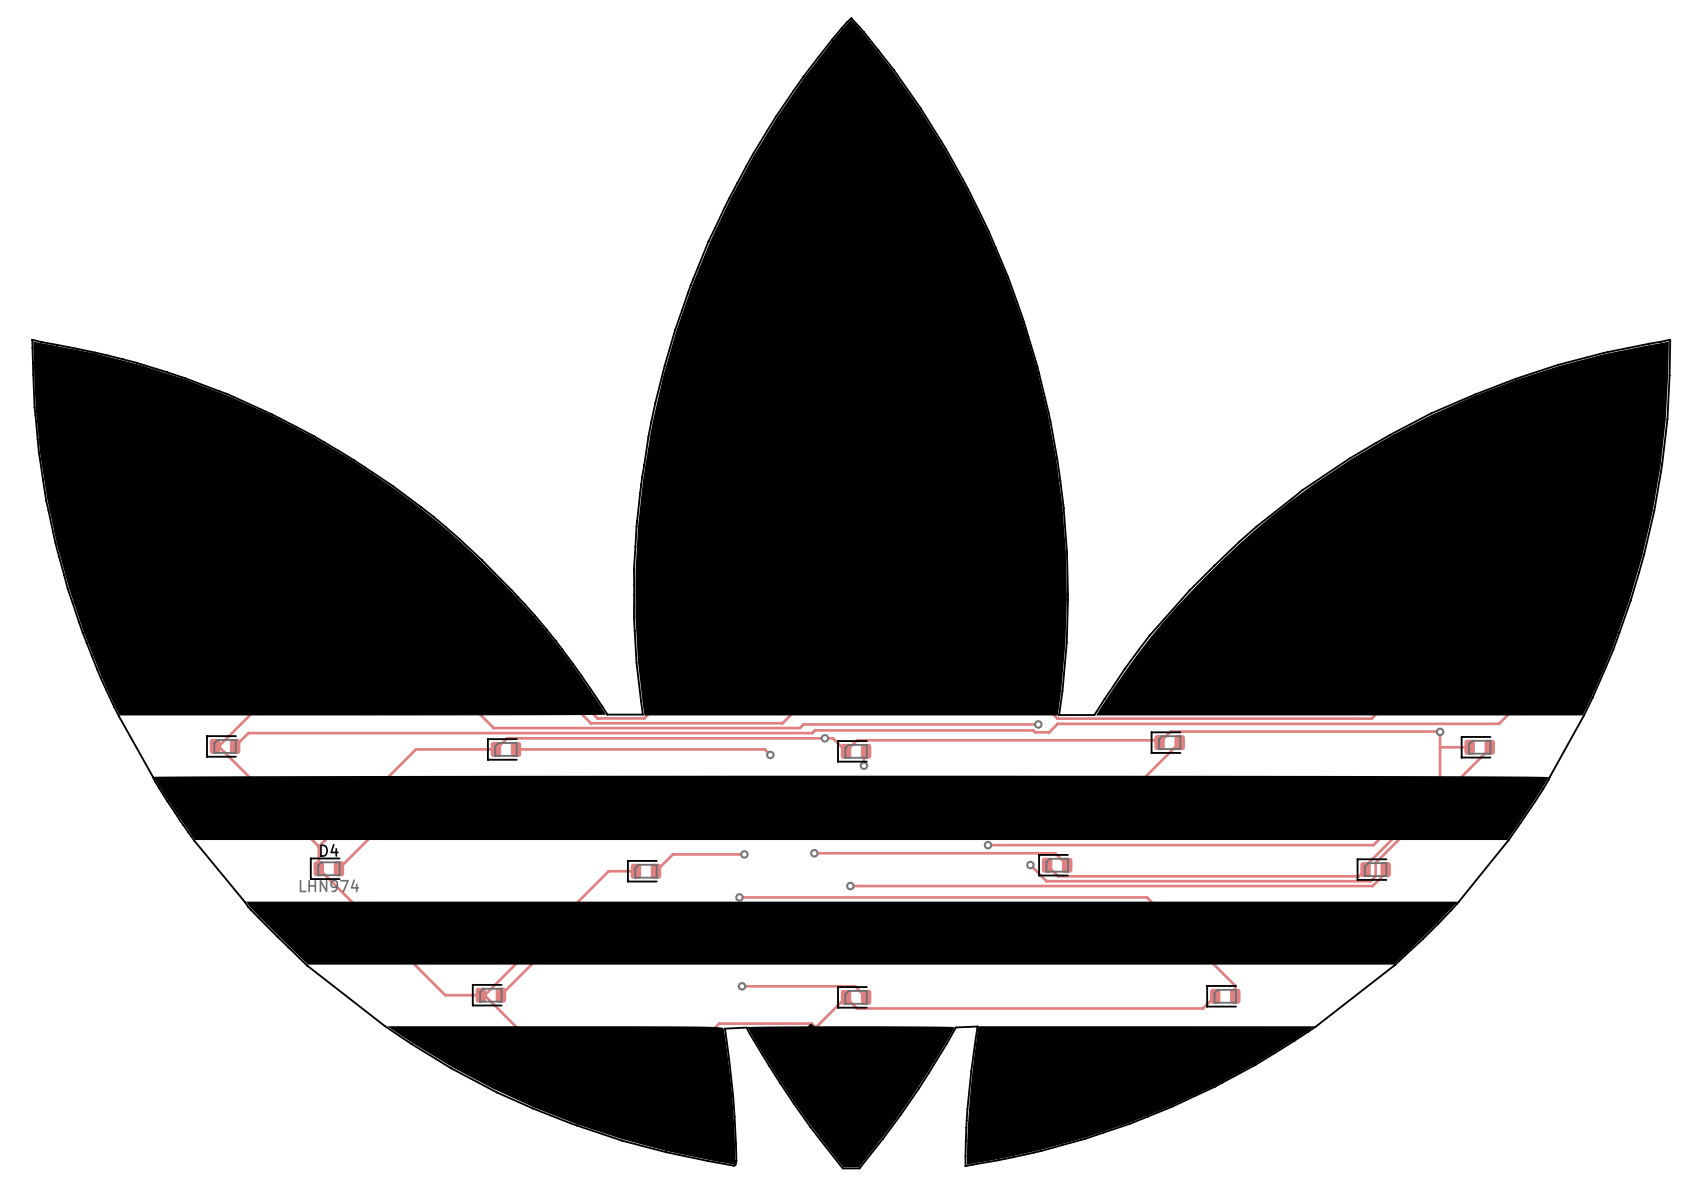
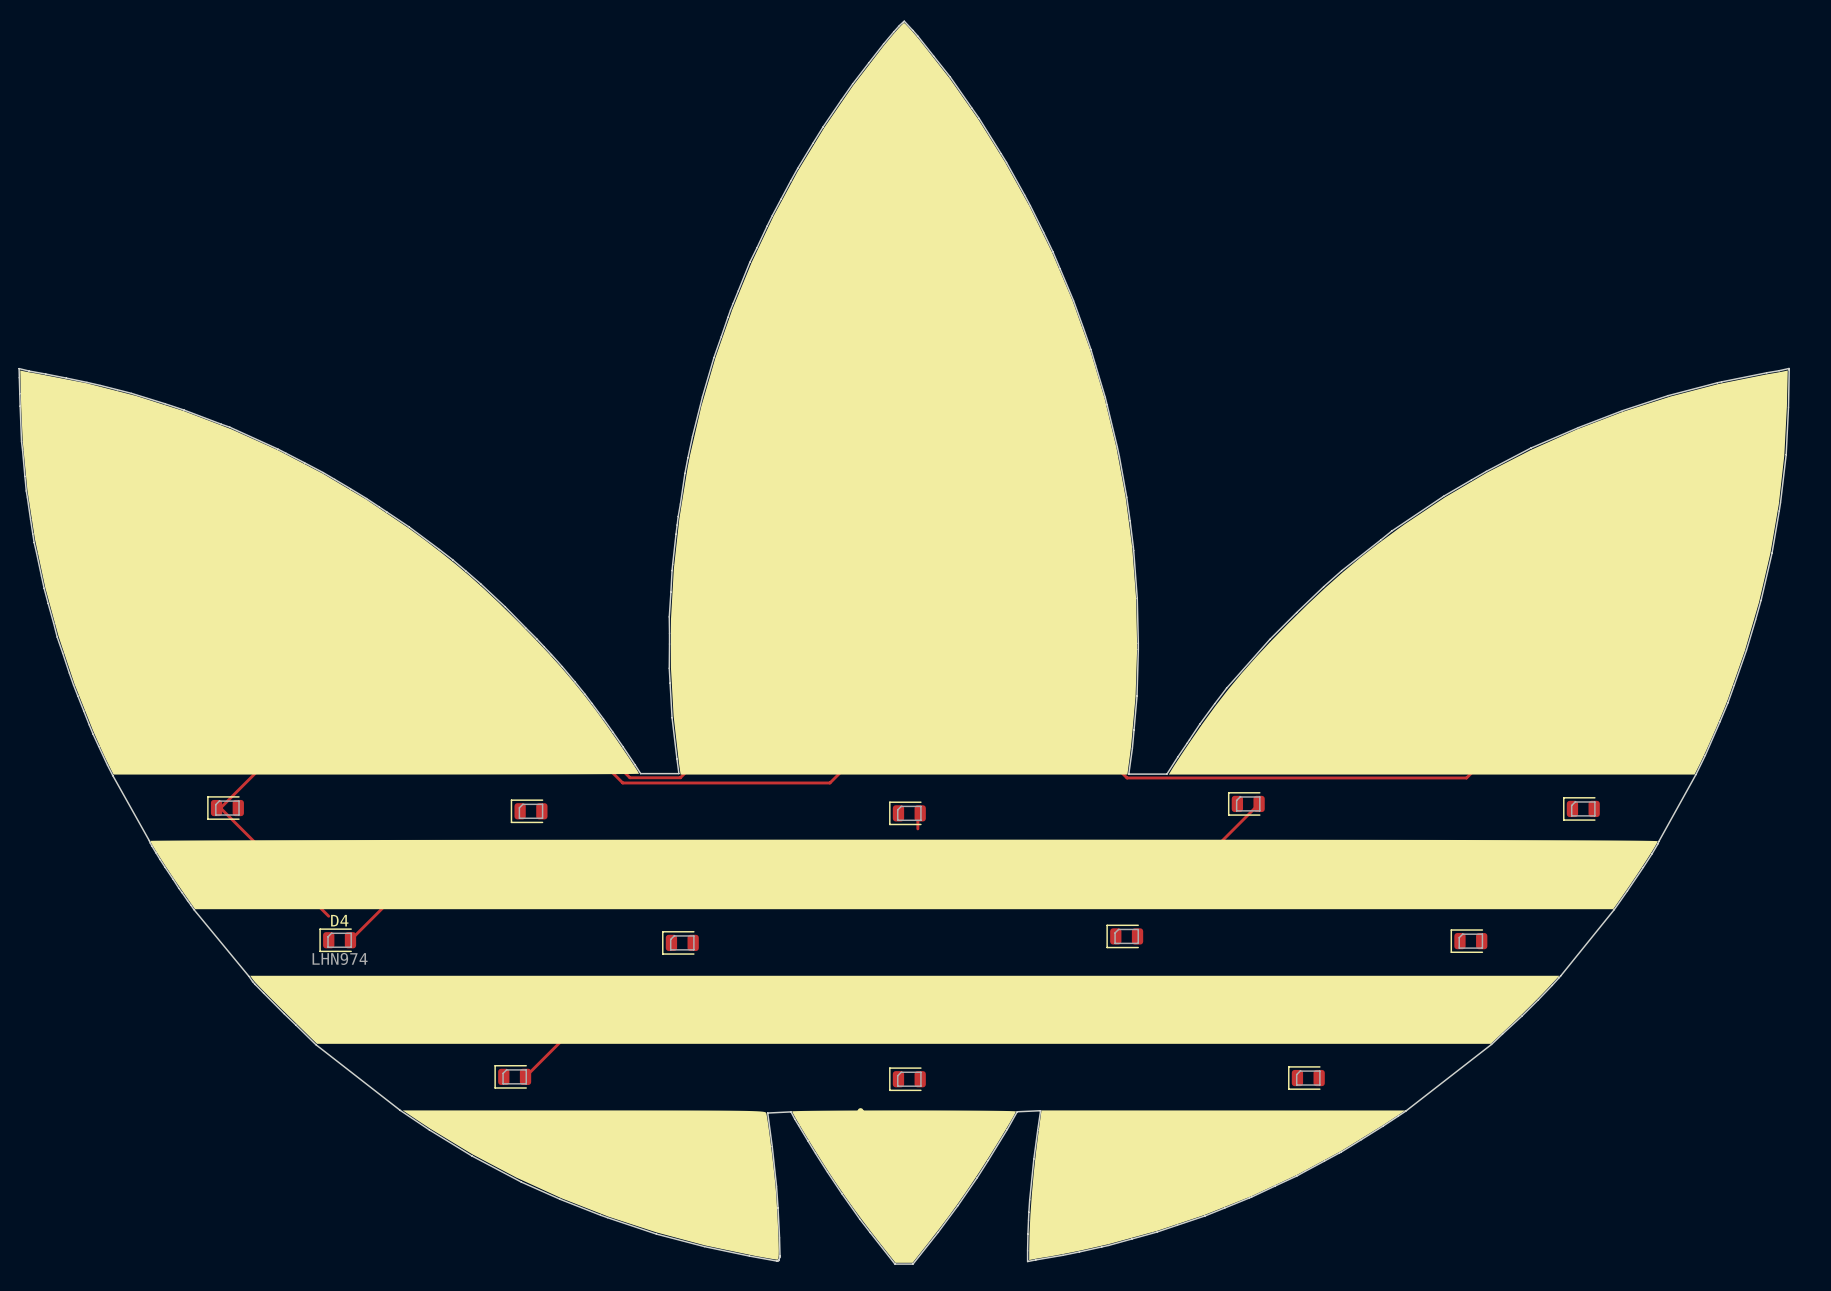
track: (396, 643) (408, 643) (493, 728) (799, 728) (803, 724) (1038, 724) -> none
track: (1532, 690) (1499, 723) (1057, 723) (1049, 732) (1035, 732) (1033, 730) (814, 730) (812, 733) (248, 733) (235, 746) -> none
via: (1038, 724) -> none
via: (1440, 731) -> none
via: (824, 738) -> none
track: (1440, 747) (1469, 747) -> none
track: (1489, 747) (1375, 862) (1375, 876) (1370, 881) (1046, 881) (1030, 865) -> none
track: (516, 749) (764, 749) (770, 754) -> none
via: (770, 754) -> none
via: (863, 765) -> none
track: (1406, 812) (1373, 845) (988, 845) -> none
via: (988, 845) -> none
track: (814, 853) (1055, 853) (1067, 865) -> none
via: (814, 853) -> none
track: (744, 854) (672, 854) (656, 871) -> none
via: (744, 854) -> none
via: (1030, 865) -> none
track: (1047, 865) (1058, 876) (1358, 876) (1365, 869) (1365, 866) (1440, 791) (1440, 731) (1170, 731) (1159, 742) (1157, 740) (857, 740) (846, 751) (832, 738) (507, 738) (495, 749) (415, 749) (318, 846) (318, 868) (445, 995) (484, 995) -> none
track: (1385, 869) (1385, 873) (1372, 886) (850, 886) -> none
track: (635, 871) (608, 871) (484, 995) (563, 1074) (668, 1074) (719, 1023) (811, 1023) (815, 1027) -> none
via: (850, 886) -> none
track: (739, 897) (1146, 897) (1235, 985) (1235, 996) -> none
via: (739, 897) -> none
track: (742, 986) (855, 986) (866, 997) -> none
via: (742, 986) -> none
track: (1215, 996) (1202, 1008) (857, 1008) (846, 997) (815, 1027) -> none

